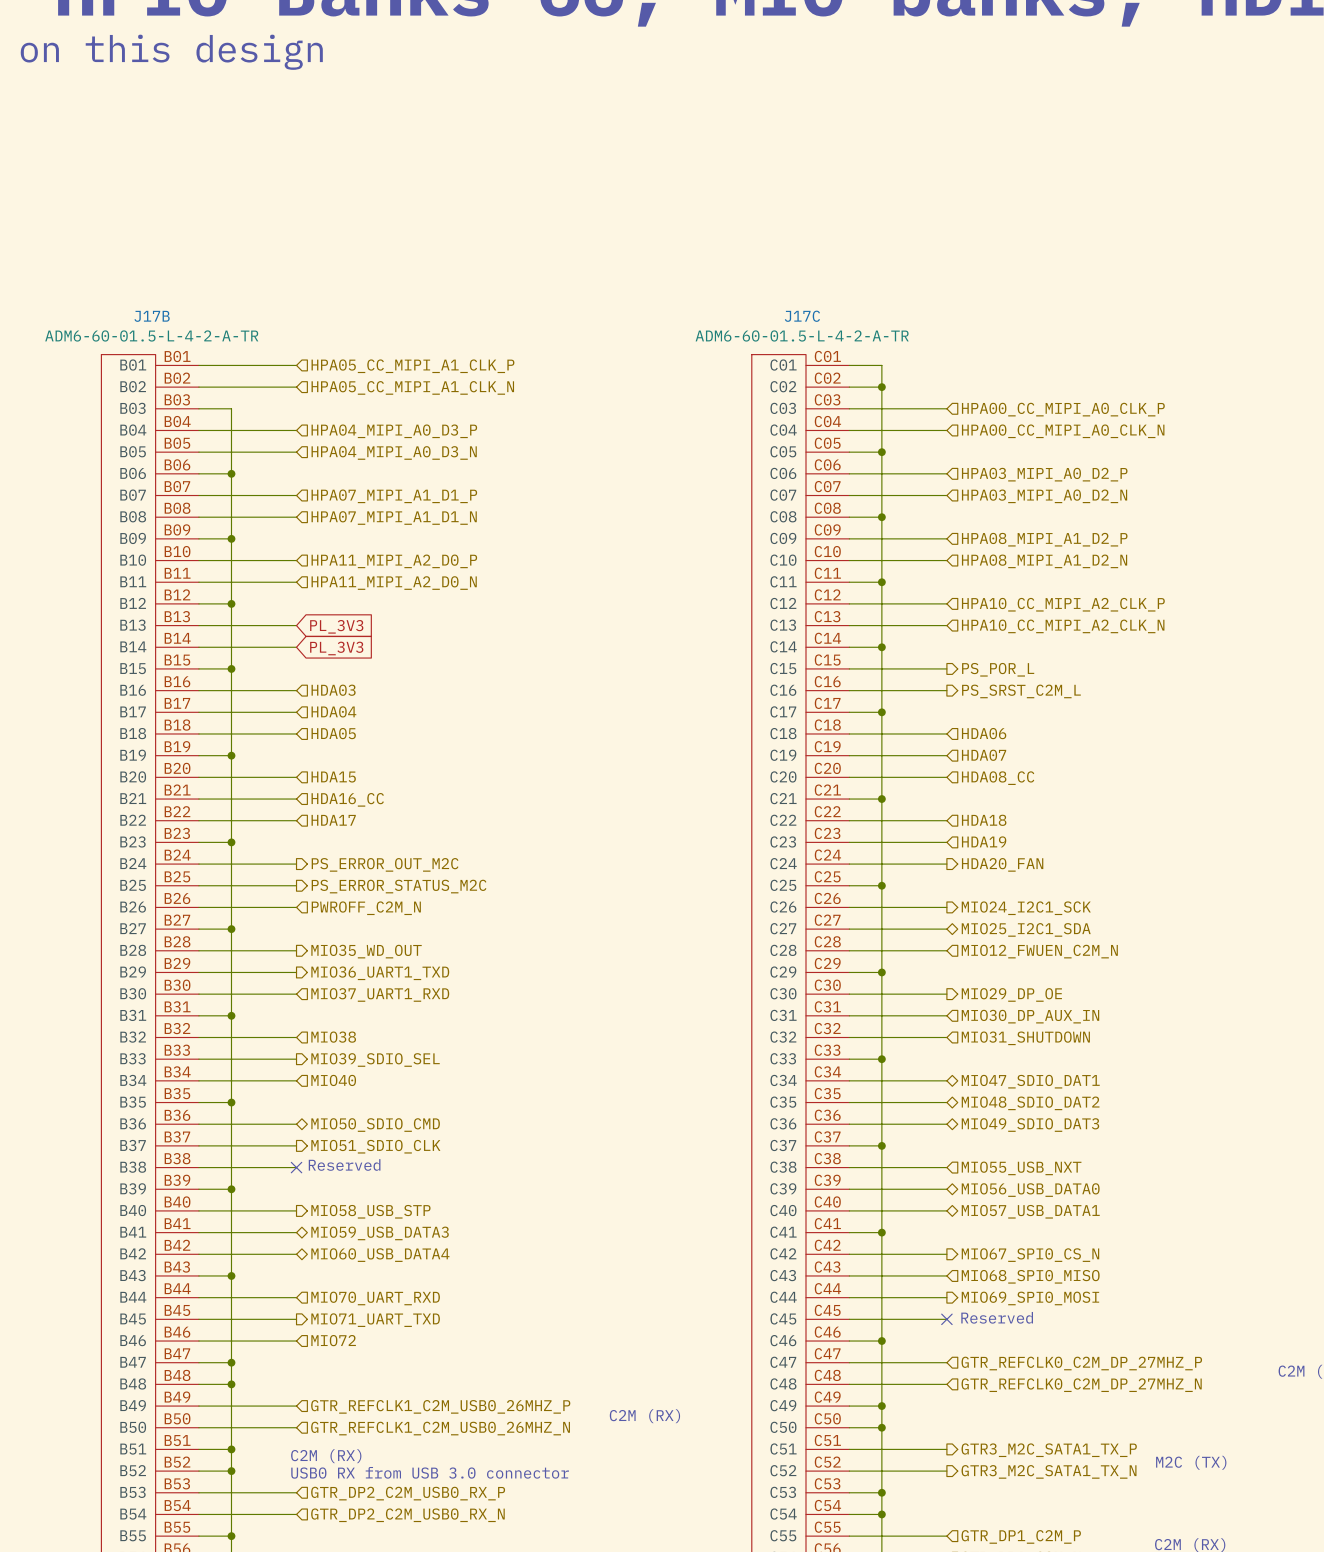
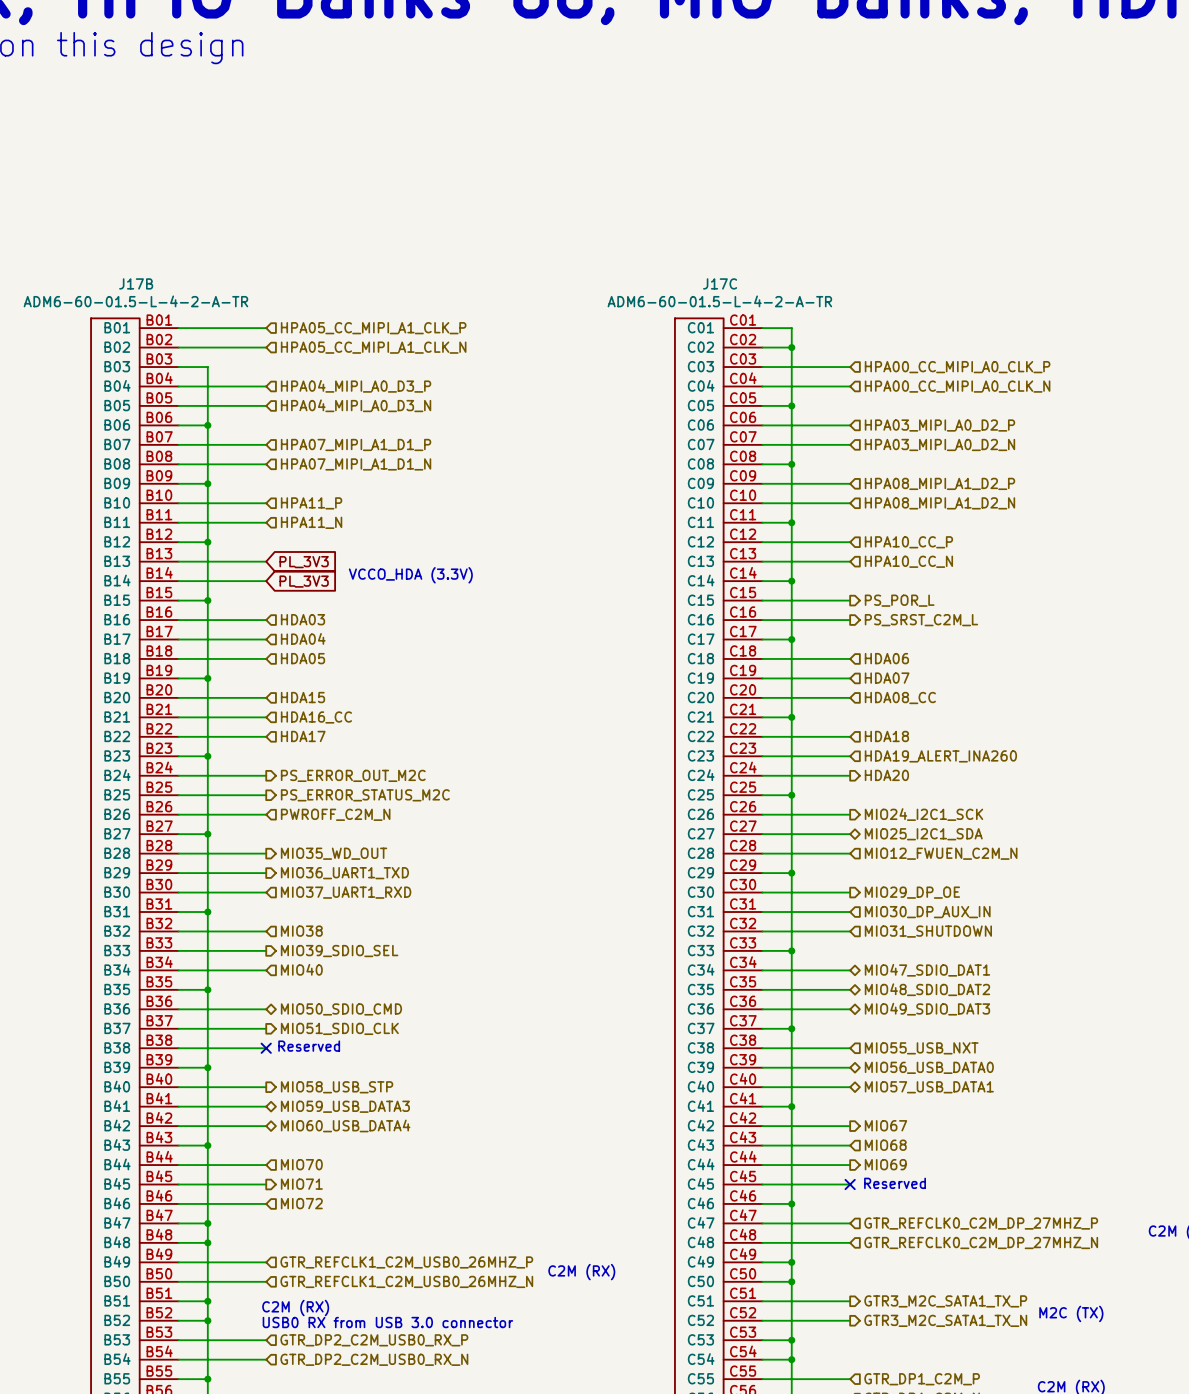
hierarchical label: HPA11_MIPI_A2_D0_P (394, 561) -> HPA11_P (311, 503)
hierarchical label: HPA11_MIPI_A2_D0_N (394, 583) -> HPA11_N (311, 522)
hierarchical label: HPA10_CC_MIPI_A2_CLK_P (1063, 604) -> HPA10_CC_P (908, 542)
hierarchical label: HPA10_CC_MIPI_A2_CLK_N (1063, 626) -> HPA10_CC_N (908, 561)
text: none -> VCCO_HDA (3.3V) (410, 575)
hierarchical label: HDA19 (984, 841) -> HDA19_ALERT_INA260 (940, 756)
hierarchical label: HDA20_FAN (1002, 864) -> HDA20 (886, 775)
hierarchical label: MIO67_SPI0_CS_N (1030, 1255) -> MIO67 (885, 1125)
hierarchical label: MIO68_SPI0_MISO (1030, 1276) -> MIO68 (885, 1145)
hierarchical label: MIO70_UART_RXD (375, 1298) -> MIO70 (301, 1164)
hierarchical label: MIO69_SPI0_MOSI (1030, 1298) -> MIO69 (885, 1164)
hierarchical label: MIO71_UART_TXD (375, 1320) -> MIO71 (301, 1184)

